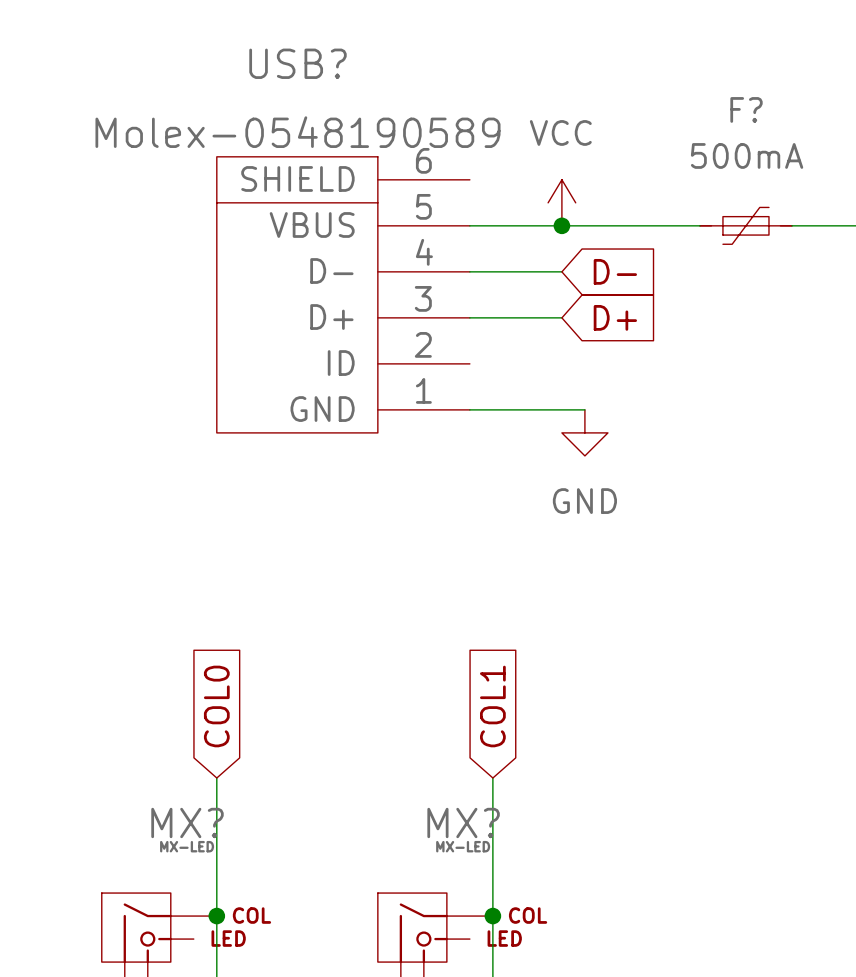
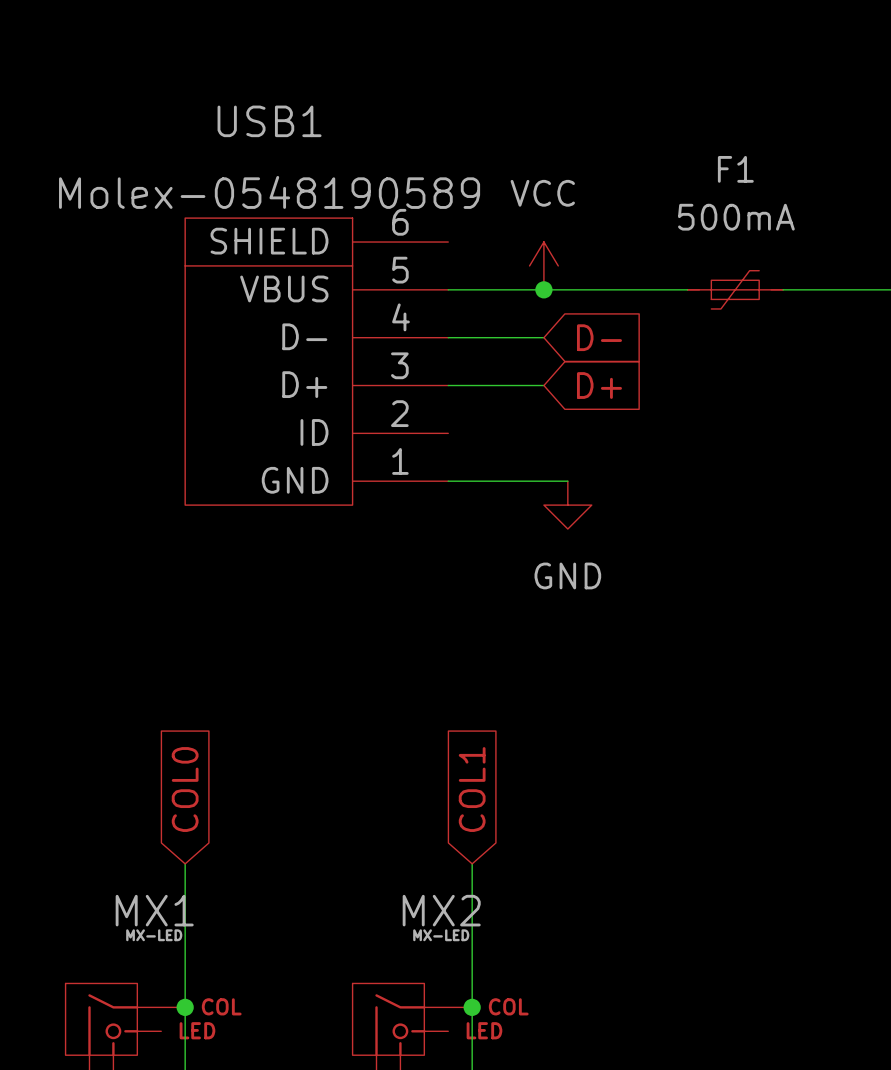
USB? name: USB? (297, 63) -> USB1 (269, 121)
F? name: F? (746, 109) -> F1 (735, 169)
MX? name: MX? (187, 822) -> MX1 (154, 910)
MX? name: MX? (463, 822) -> MX2 (441, 910)

